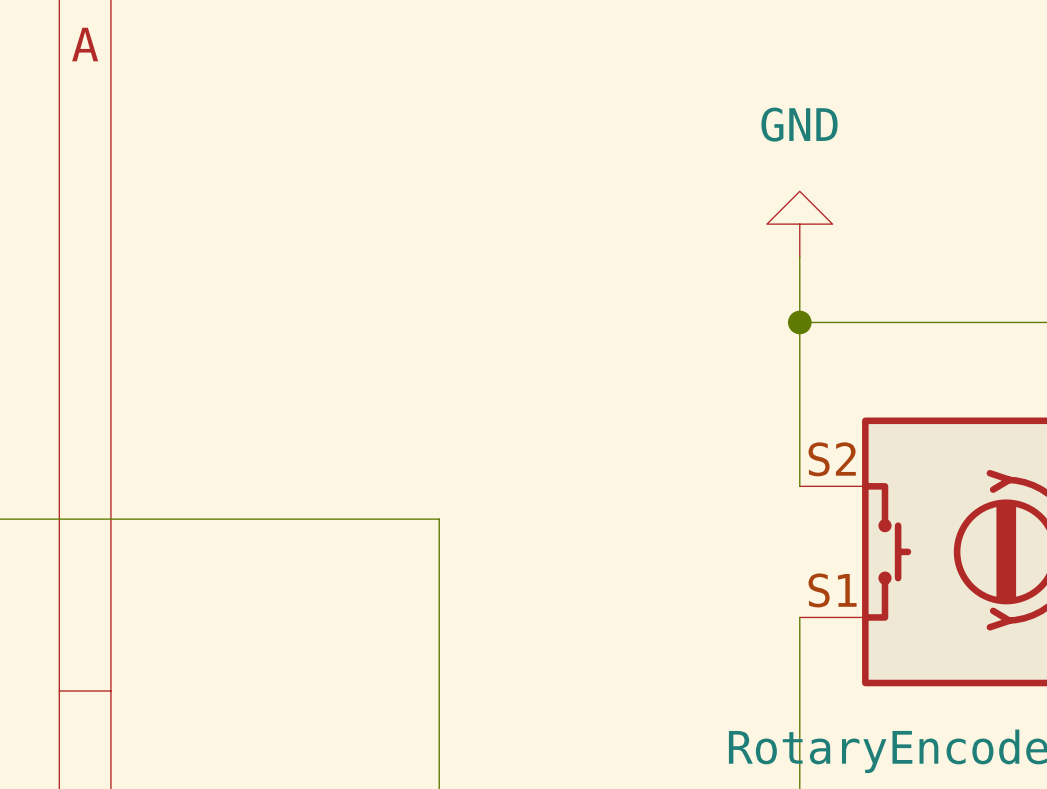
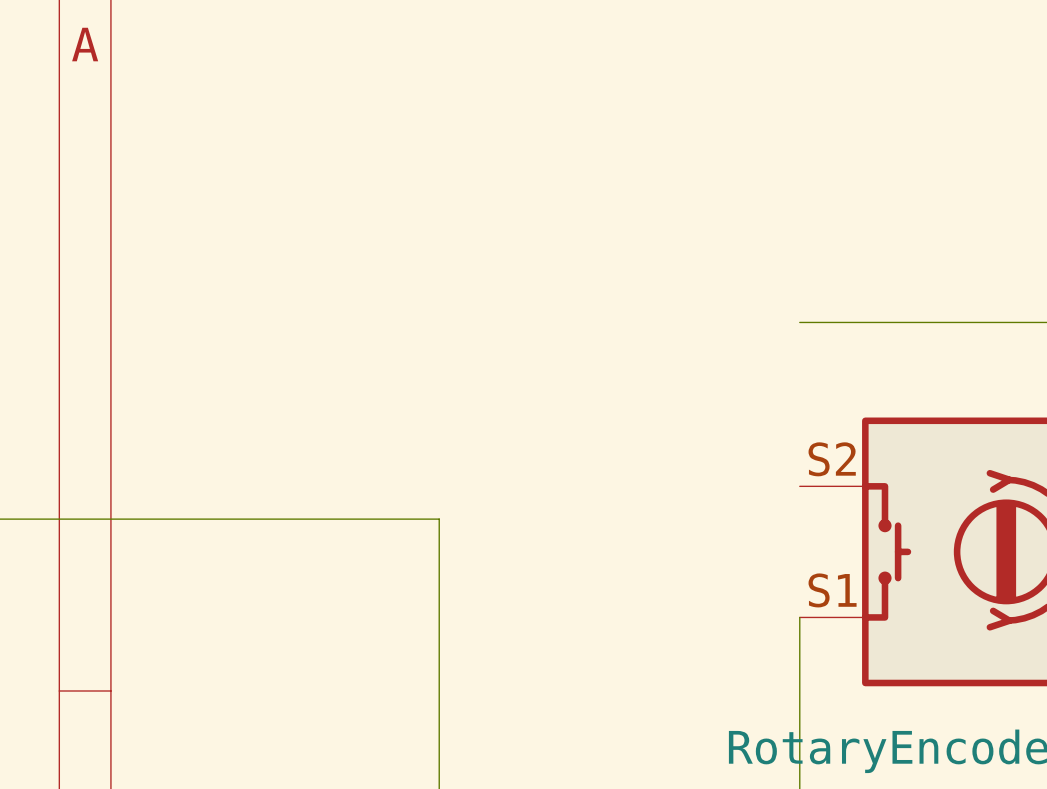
power symbol: GND (799, 224) -> none
wire: (799, 256) (799, 486) -> none
junction: (799, 322) -> none

